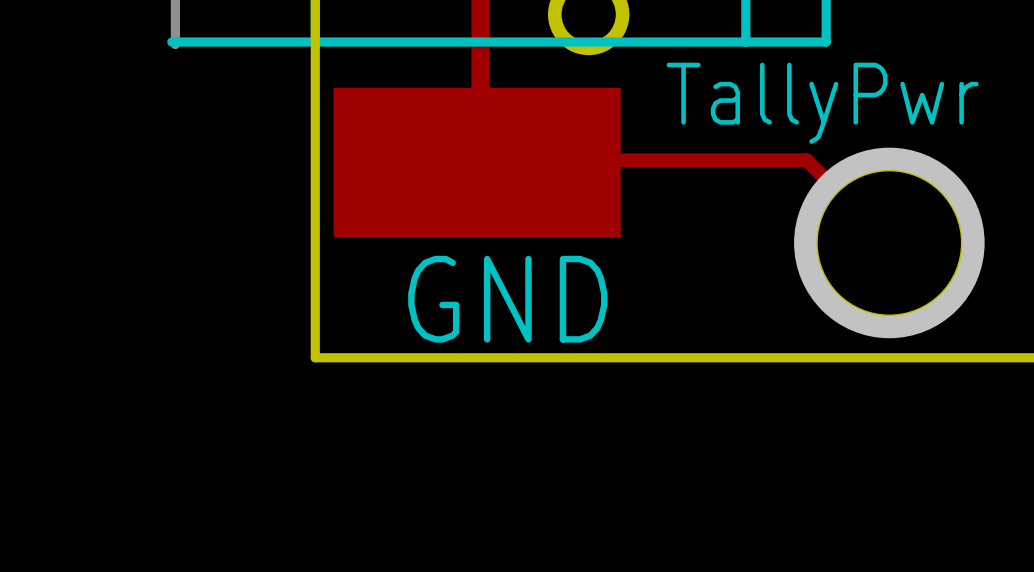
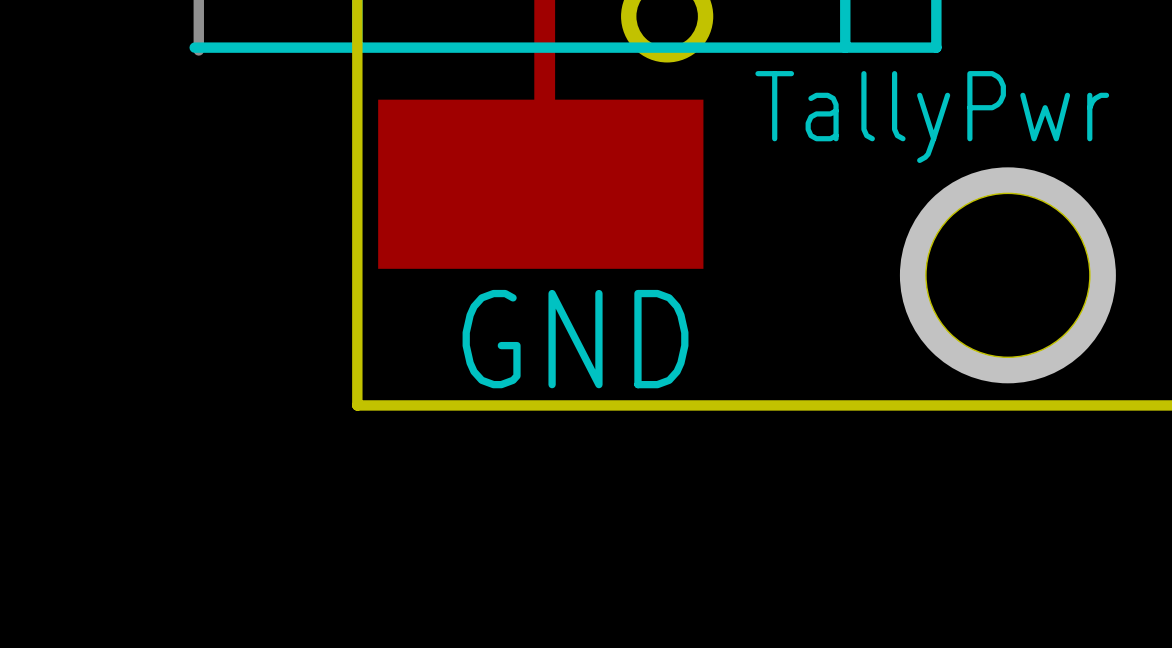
track: (480, 160) (806, 160) (889, 242) -> none

